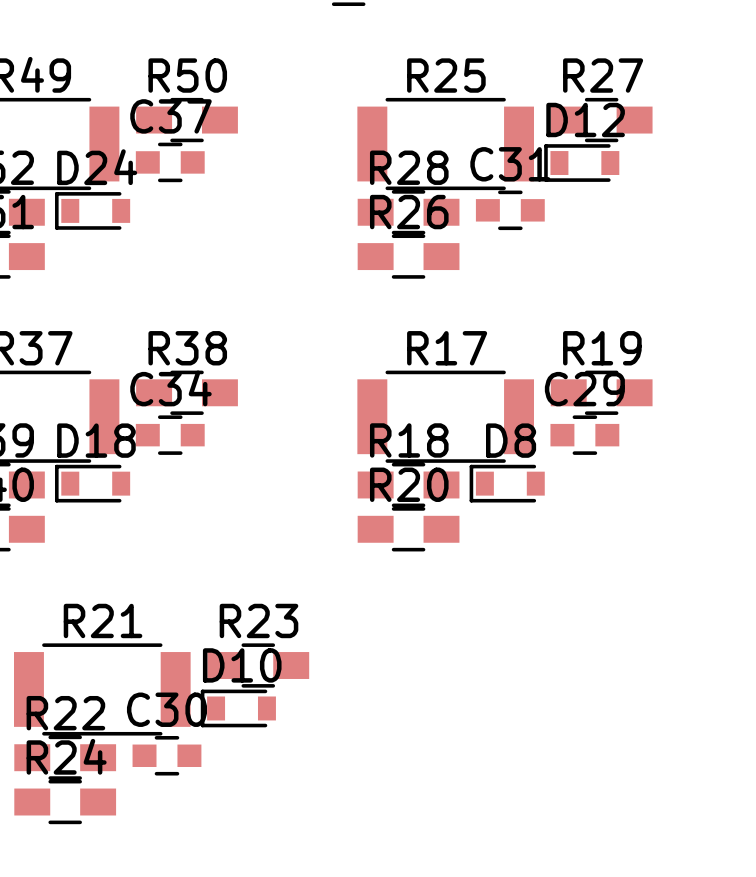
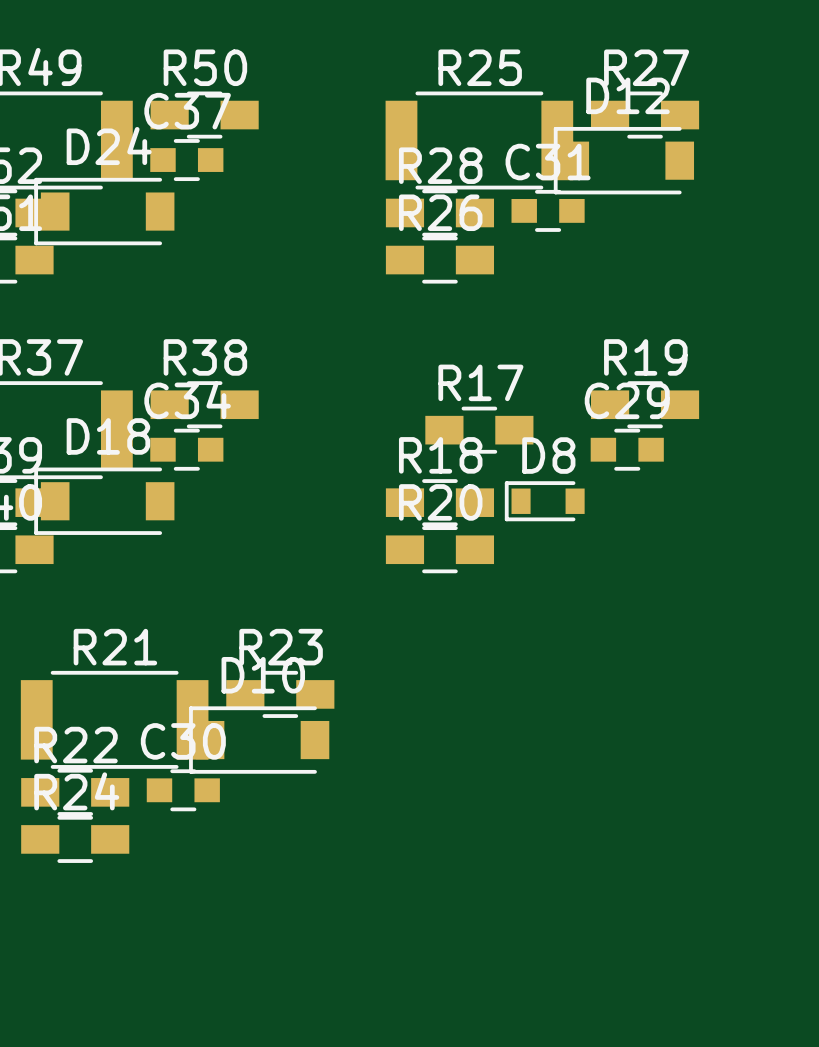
D12 footprint: [544, 144, 620, 182] -> [553, 126, 695, 195]
D24 footprint: [55, 192, 131, 230] -> [34, 177, 175, 246]
R17 footprint: [357, 370, 534, 463] -> [425, 406, 534, 454]
D18 footprint: [55, 464, 131, 503] -> [34, 467, 175, 535]
D10 footprint: [200, 689, 276, 728] -> [189, 706, 330, 774]

